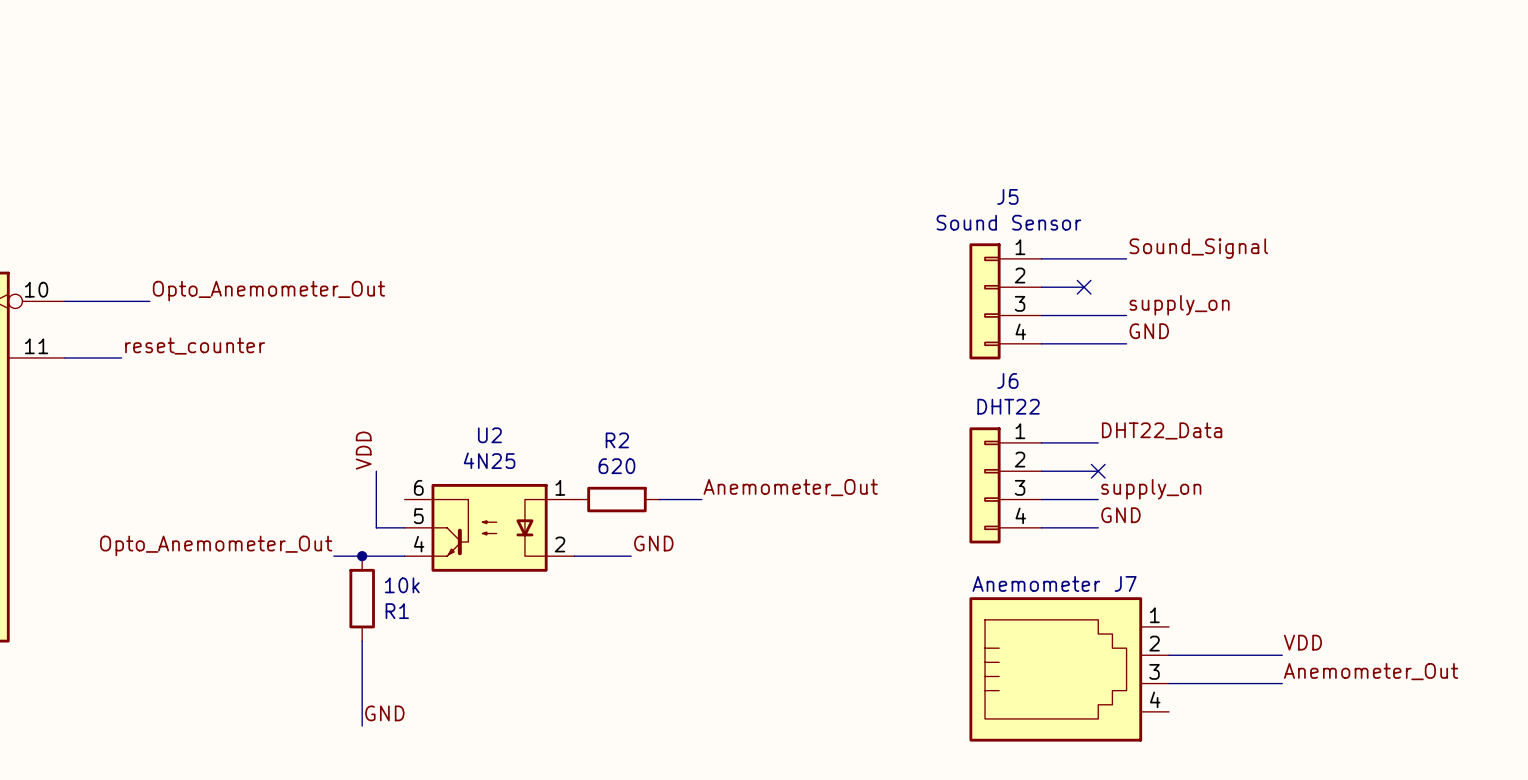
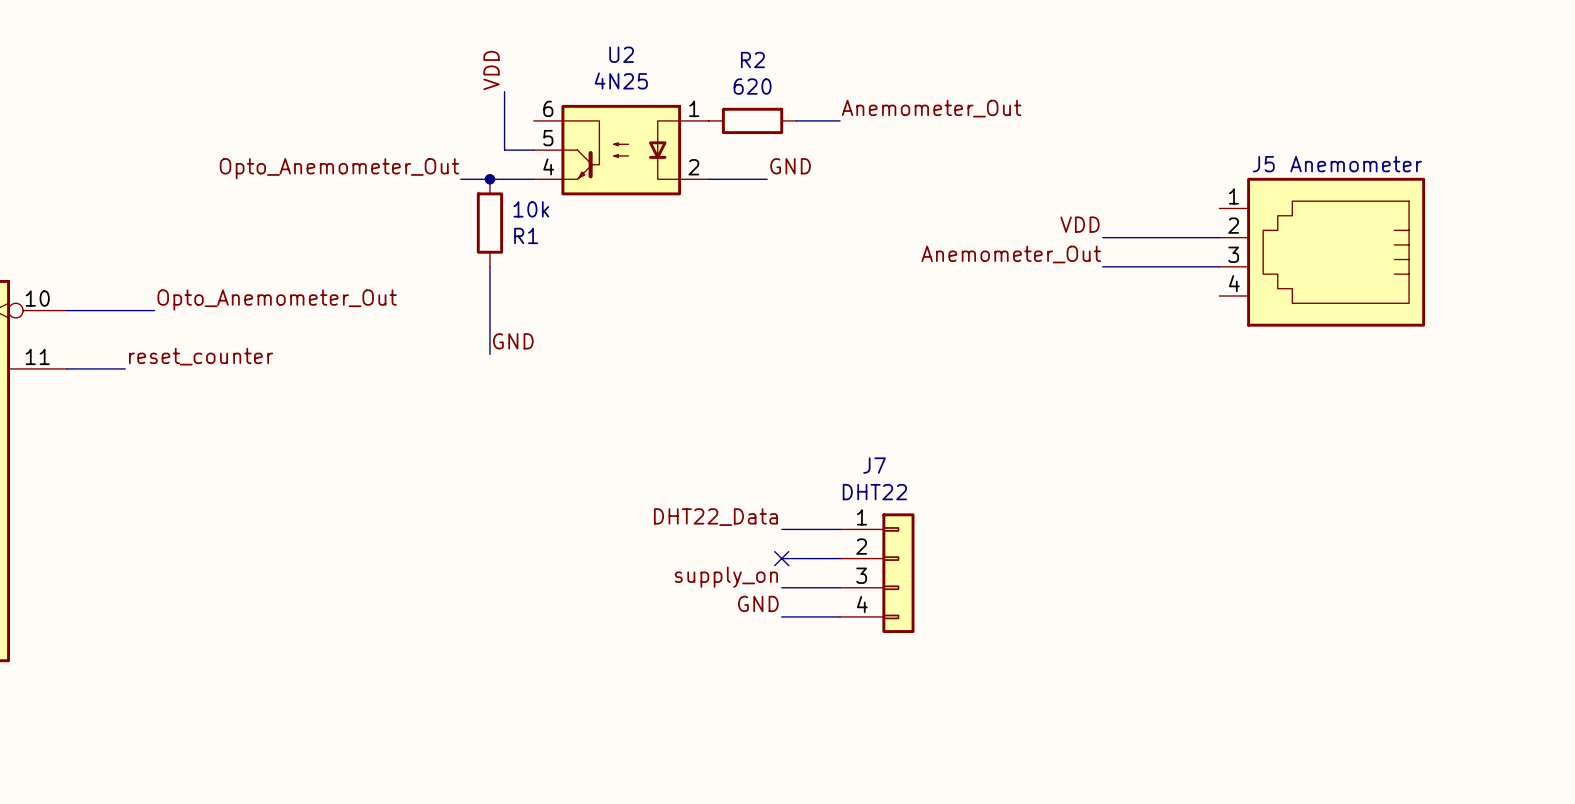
label: none -> VDD (491, 70)
wire: none -> (504, 91) (504, 150) (533, 150)
label: none -> Anemometer_Out (931, 108)
wire: none -> (796, 120) (840, 120)
label: none -> GND (790, 166)
label: none -> Opto_Anemometer_Out (339, 168)
wire: none -> (460, 179) (533, 179)
junction: none -> (489, 179)
wire: none -> (708, 179) (767, 179)
J5 name position: J5 (1007, 196) -> J5 (1263, 164)
label: none -> VDD (1080, 224)
J5 value: Sound Sensor (1008, 222) -> Anemometer (1356, 164)
wire: none -> (1102, 237) (1219, 237)
J5 symbol: [969, 243, 1042, 360] -> [1219, 177, 1426, 327]
label: none -> Anemometer_Out (1011, 254)
label: Sound_Signal (1198, 248) -> none
wire: none -> (489, 266) (489, 354)
wire: (1041, 258) (1069, 258) -> none
wire: (1041, 287) (1084, 287) -> none
no-connect mark: (1084, 287) -> none
label: supply_on (1179, 305) -> none
wire: (1041, 315) (1126, 315) -> none
label: none -> GND (513, 341)
label: GND (1149, 331) -> none
wire: (1041, 343) (1126, 343) -> none
label: DHT22_Data (1162, 430) -> none
wire: (1041, 442) (1098, 442) -> (1161, 266) (1219, 266)
label: VDD (363, 450) -> none
wire: (376, 471) (376, 527) (404, 527) -> none
wire: (1041, 471) (1098, 471) -> none
no-connect mark: (1098, 471) -> none
J6: DHT22 (1005, 485) -> none
label: Anemometer_Out (790, 487) -> none
label: supply_on (1151, 489) -> none
R2 position: (616, 499) -> (752, 120)
wire: (659, 499) (701, 499) -> none
wire: (1041, 499) (1098, 499) -> none
label: none -> DHT22_Data (715, 517)
wire: none -> (781, 529) (840, 529)
label: GND (1120, 515) -> none
U2 position: (489, 527) -> (621, 150)
wire: (1041, 527) (1098, 527) -> none
no-connect mark: none -> (781, 558)
label: GND (653, 543) -> none
label: Opto_Anemometer_Out (216, 545) -> none
wire: (333, 556) (404, 556) -> none
junction: (362, 556) -> none
wire: (574, 556) (631, 556) -> (781, 558) (840, 558)
label: none -> supply_on (726, 577)
wire: none -> (781, 587) (840, 587)
J7 value: Anemometer (1036, 583) -> DHT22 (874, 492)
J7 name position: J7 (1125, 583) -> J7 (874, 465)
label: none -> GND (758, 603)
J7 symbol: [969, 597, 1170, 742] -> [840, 513, 915, 634]
R1 position: (362, 598) -> (489, 223)
wire: none -> (781, 616) (840, 616)
wire: (362, 641) (362, 726) -> none
label: VDD (1302, 642) -> none
wire: (1169, 655) (1282, 655) -> none
label: Anemometer_Out (1371, 671) -> none
wire: (1169, 683) (1282, 683) -> none
label: GND (384, 713) -> none

